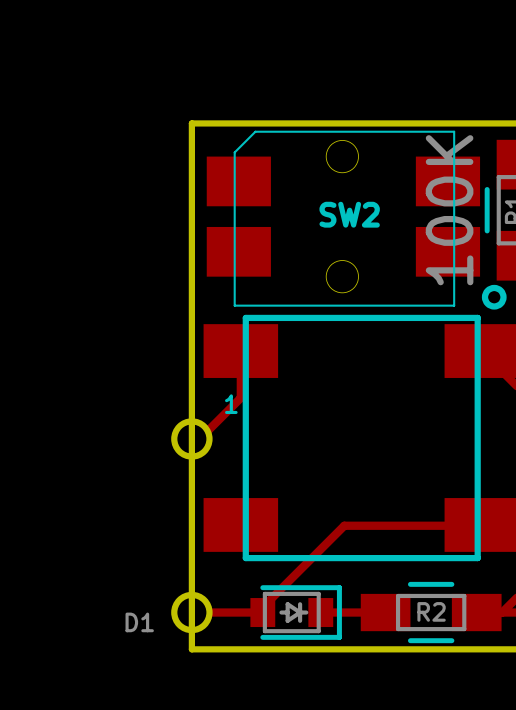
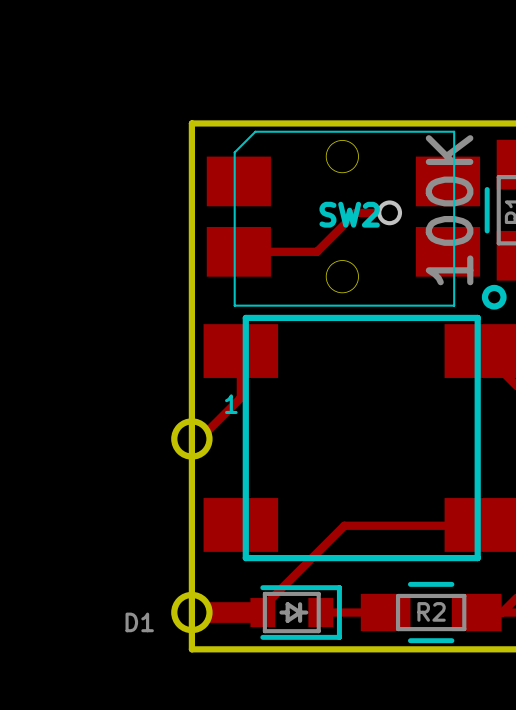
track: none -> (389, 212) (355, 212) (317, 251) (238, 251)
via: none -> (389, 212)
track width: thin (191, 612) (260, 612) -> thick (191, 612) (260, 612)

